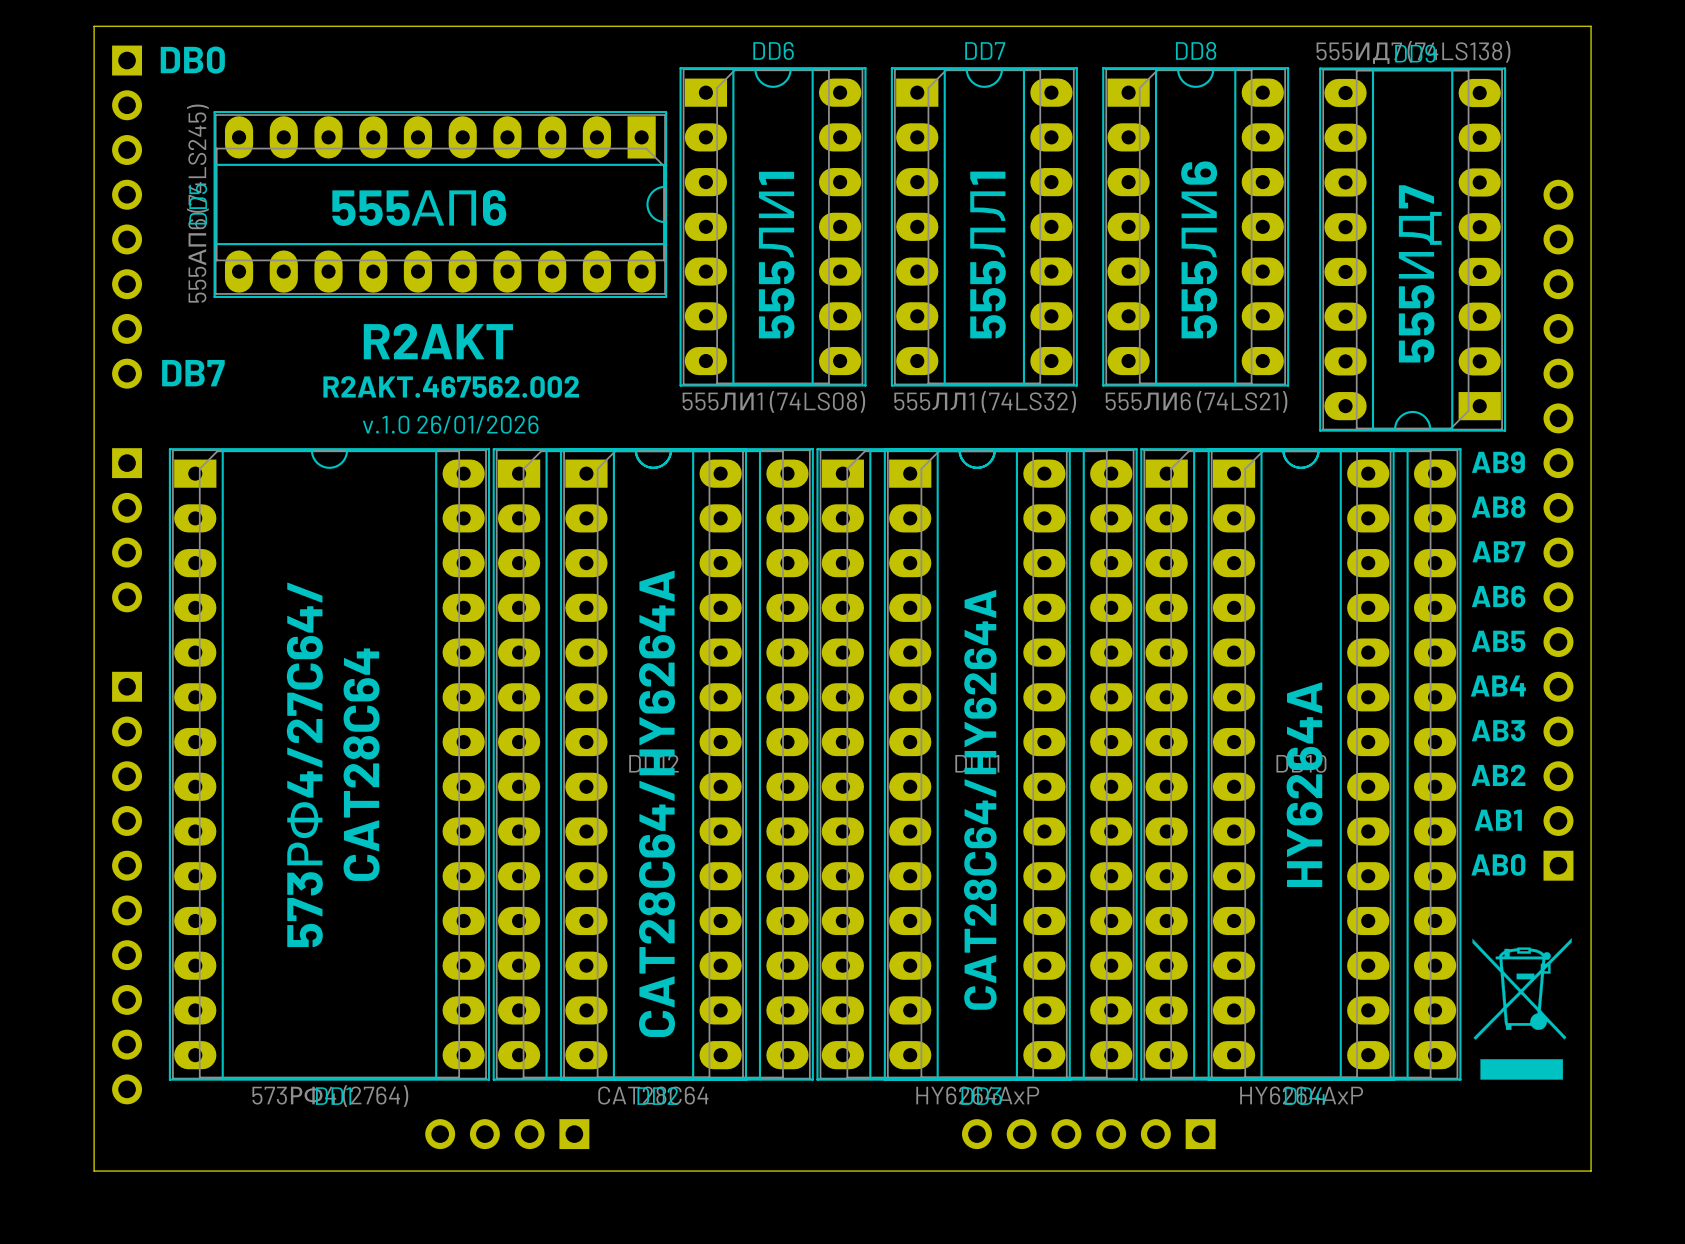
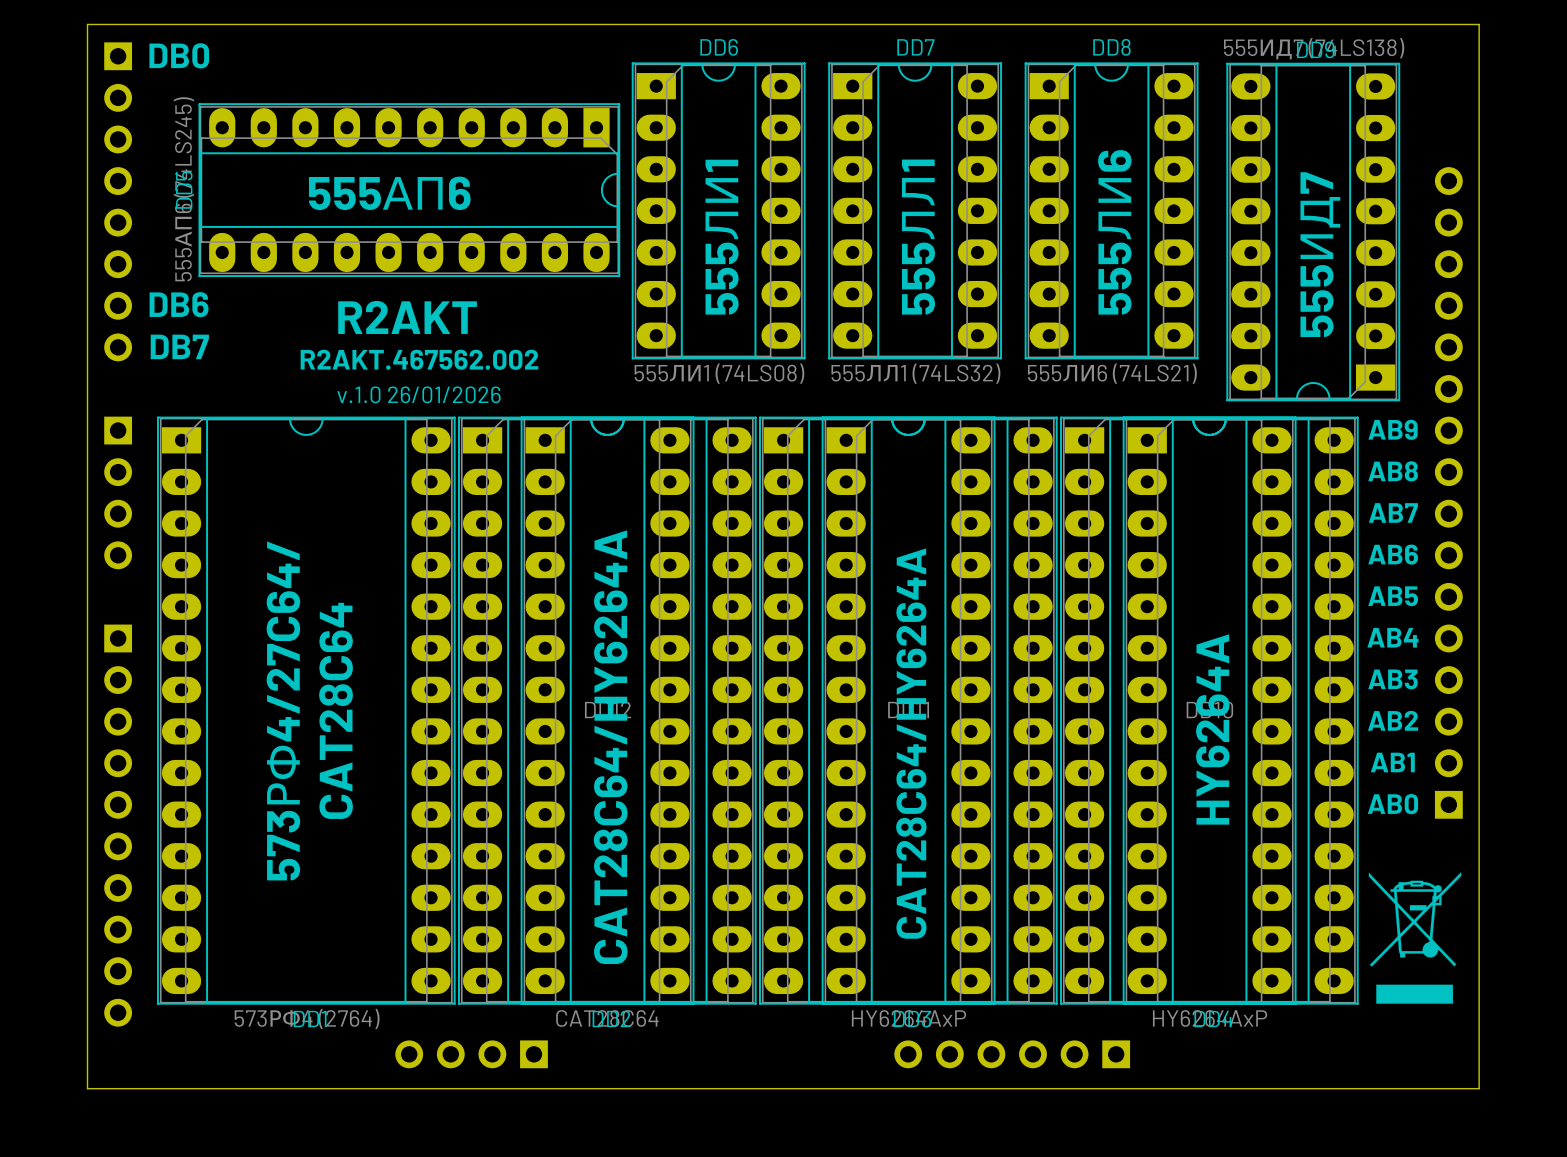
text: none -> DB6 (179, 304)

